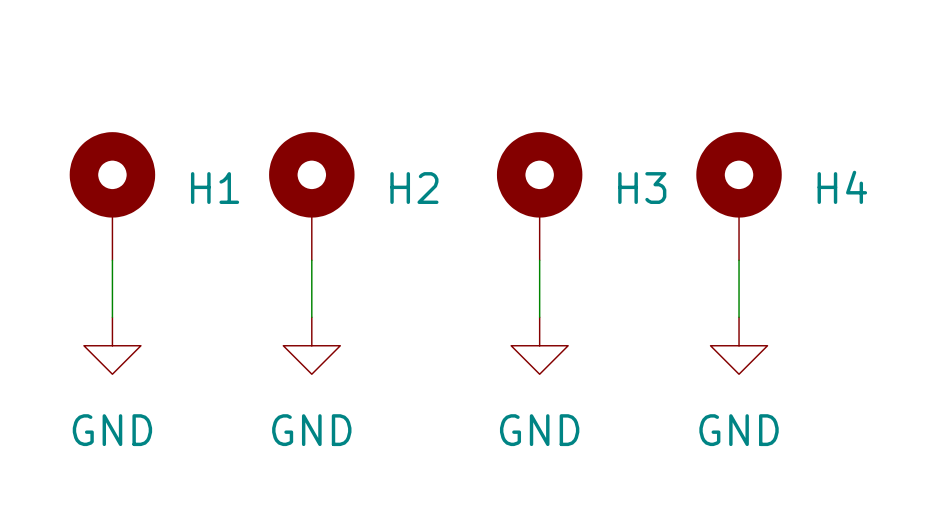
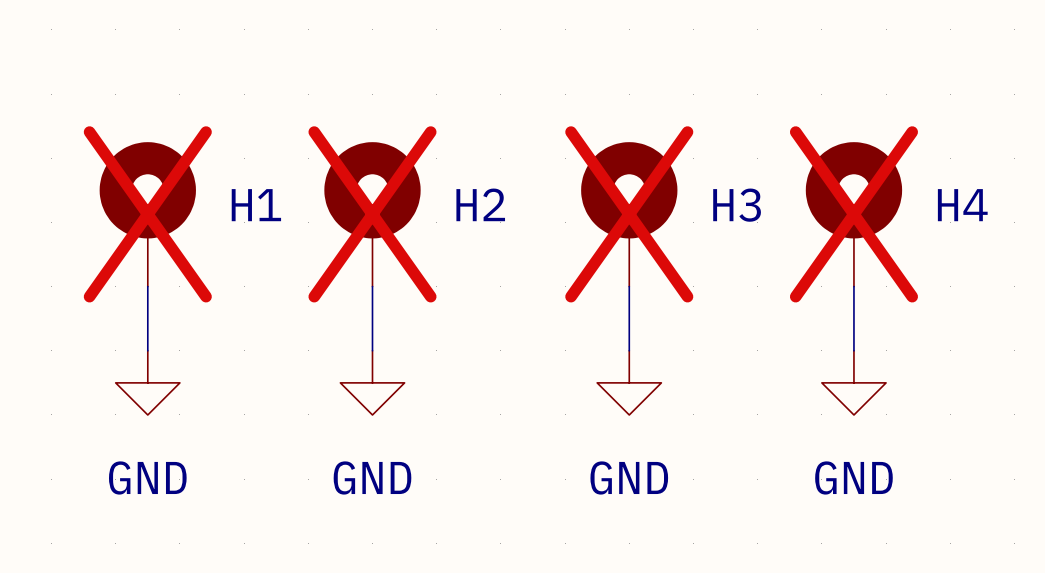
H1 do-not-place cross: none -> (147, 214)
H2 do-not-place cross: none -> (372, 214)
H3 do-not-place cross: none -> (629, 214)
H4 do-not-place cross: none -> (853, 214)

